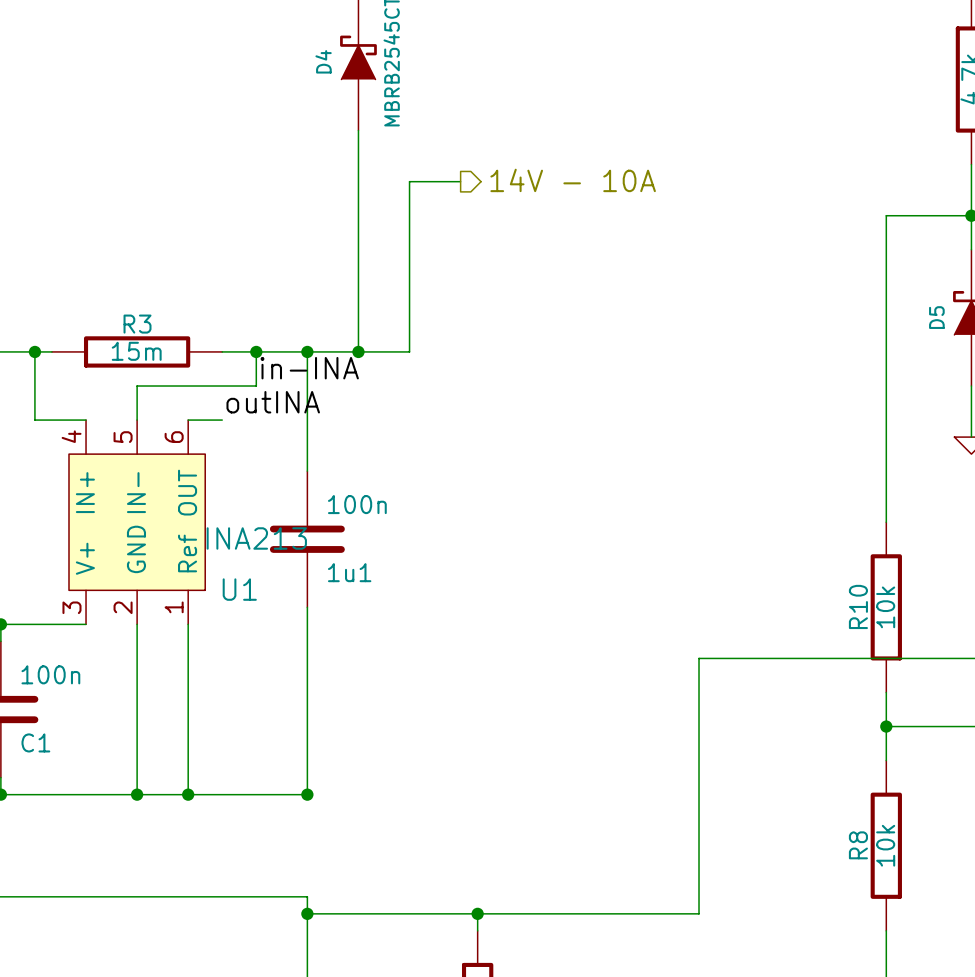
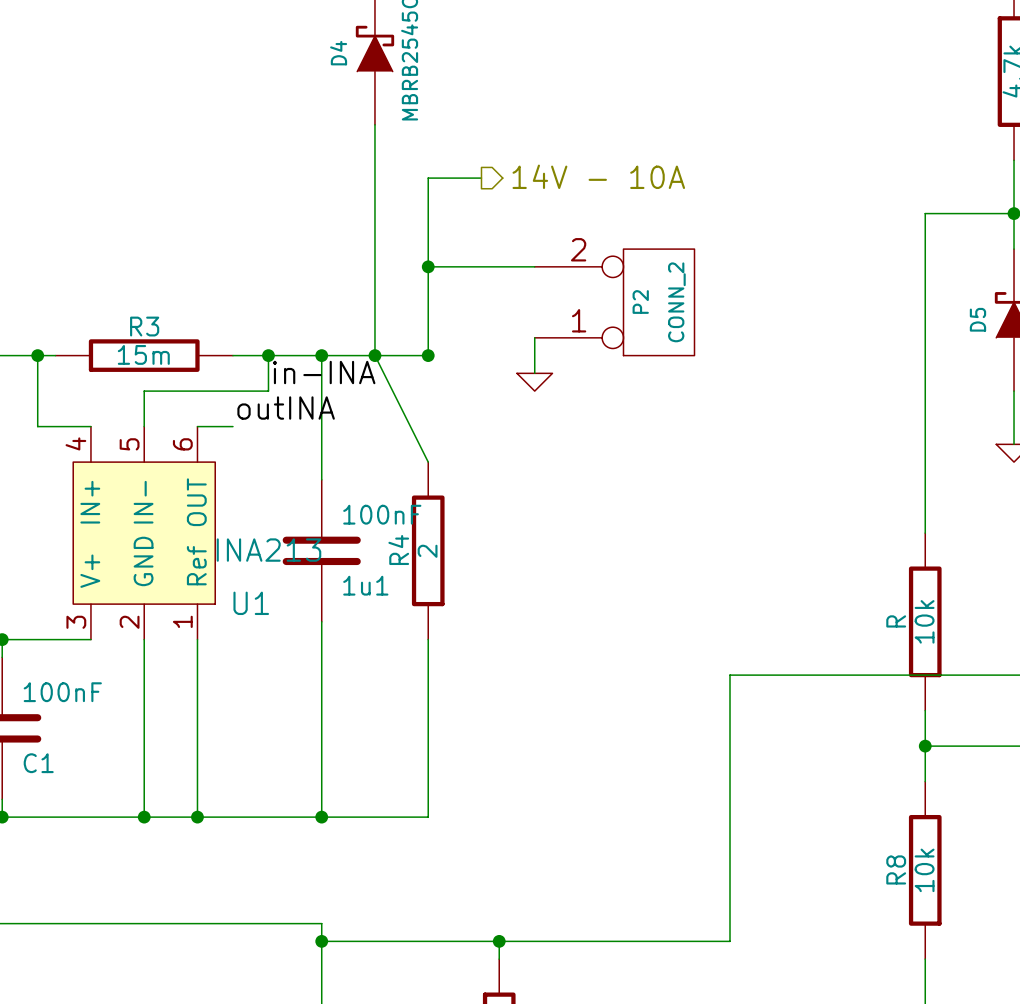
wire: none -> (428, 266) (534, 266)
junction: none -> (428, 266)
P2: none -> CONN_2 (614, 302)
wire: none -> (534, 337) (534, 373)
wire: none -> (374, 355) (428, 462)
junction: none -> (428, 355)
power symbol: none -> (534, 382)
1u1 value: 100n (357, 504) -> 100nF (382, 514)
R4: none -> 2 (428, 550)
R10 name: R10 (858, 606) -> R (896, 621)
wire: none -> (428, 639) (428, 817) (321, 817)
C1 value: 100n (50, 674) -> 100nF (62, 692)

